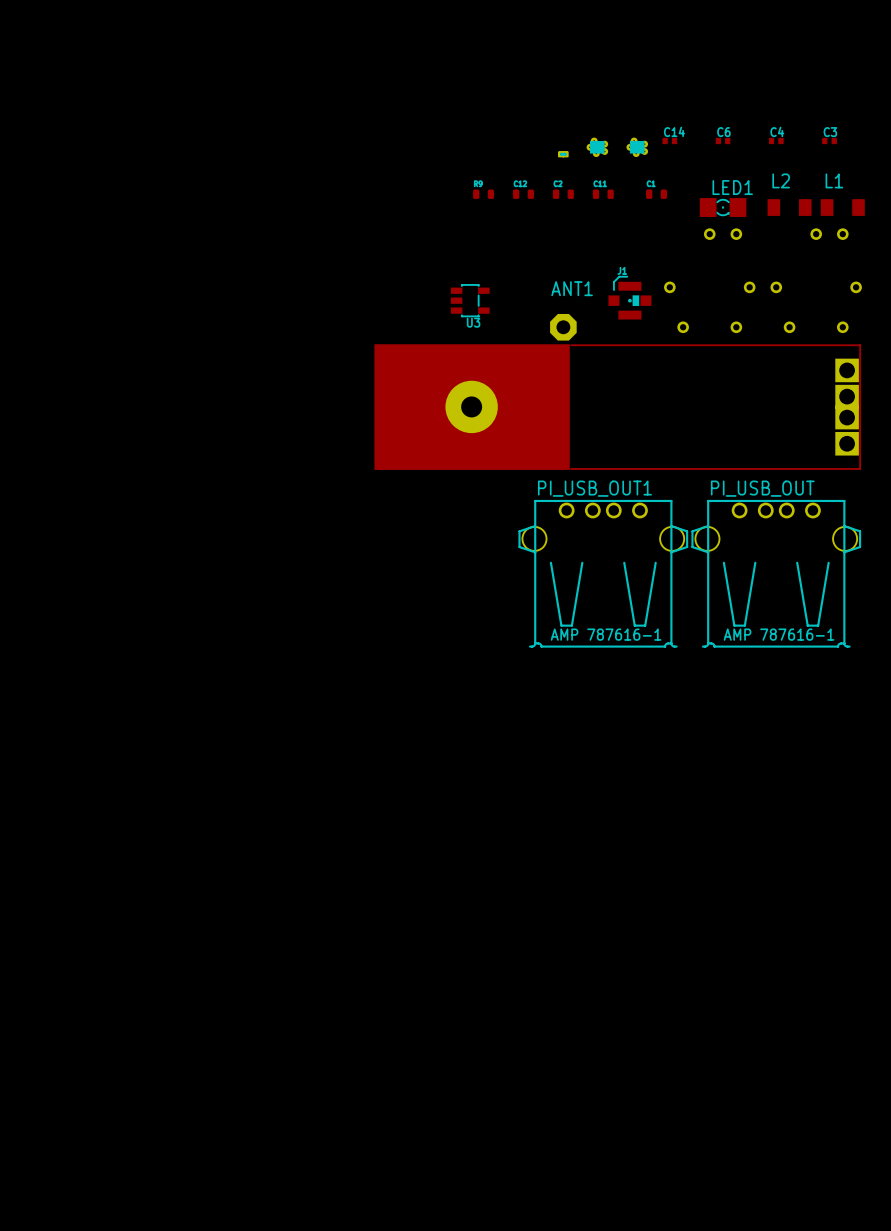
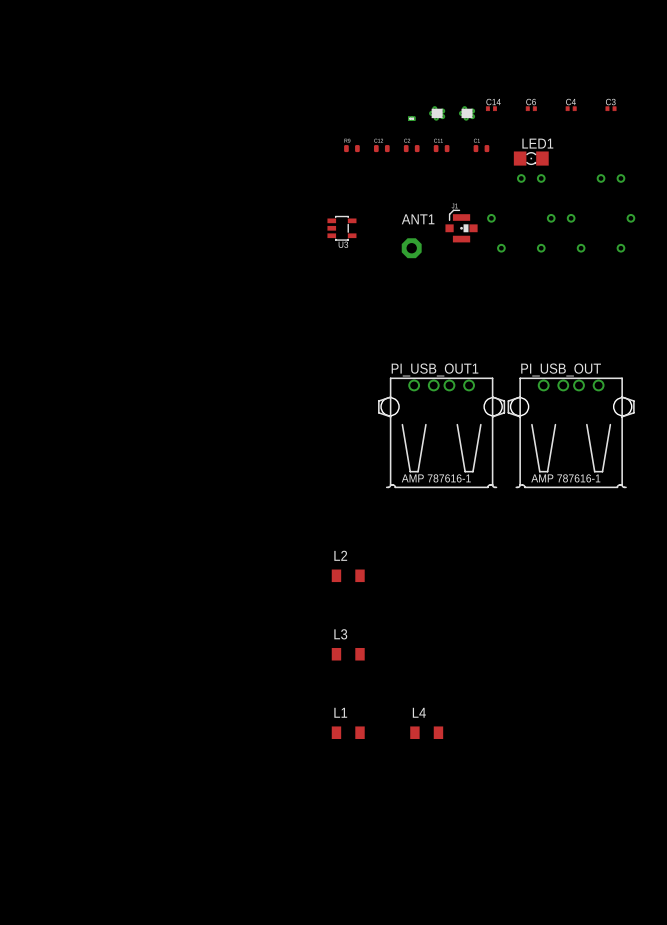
L2 position: (789, 207) -> (348, 575)
L1 position: (842, 207) -> (348, 732)
part: (617, 407) -> none
L3: none -> (348, 654)
L4: none -> (426, 732)

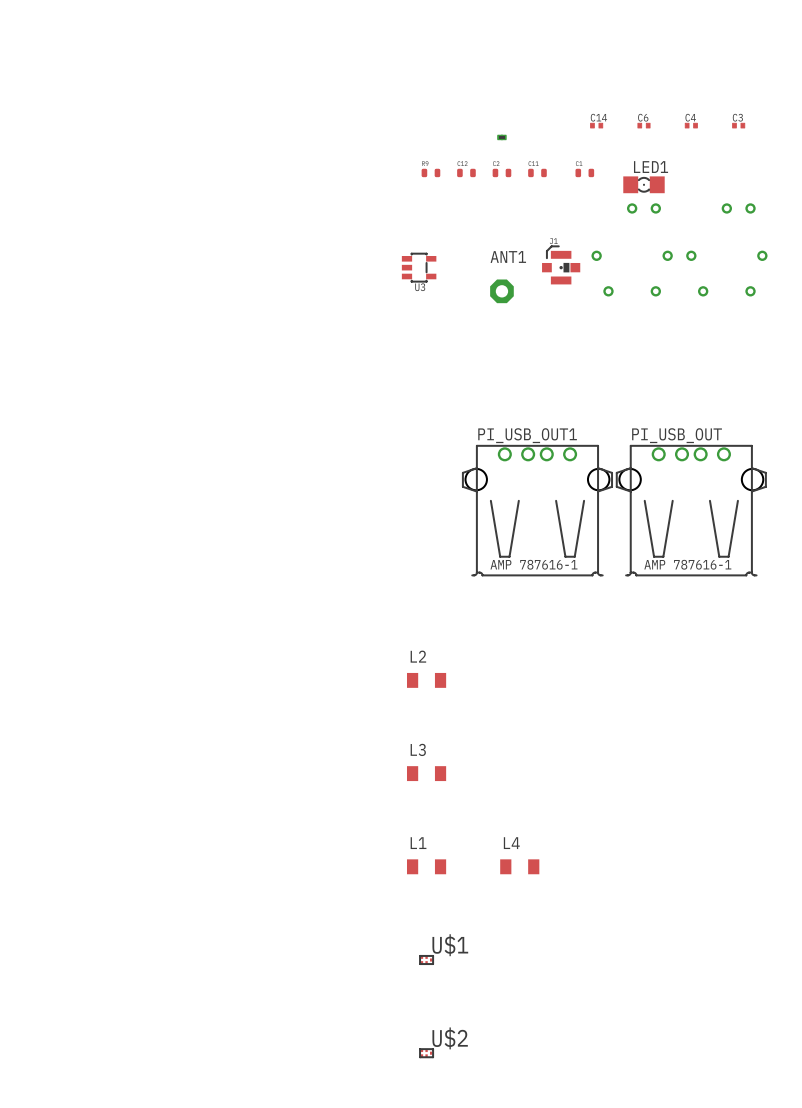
part: (437, 113) -> none
part: (467, 113) -> none
U$1: none -> (426, 959)
U$2: none -> (426, 1053)

